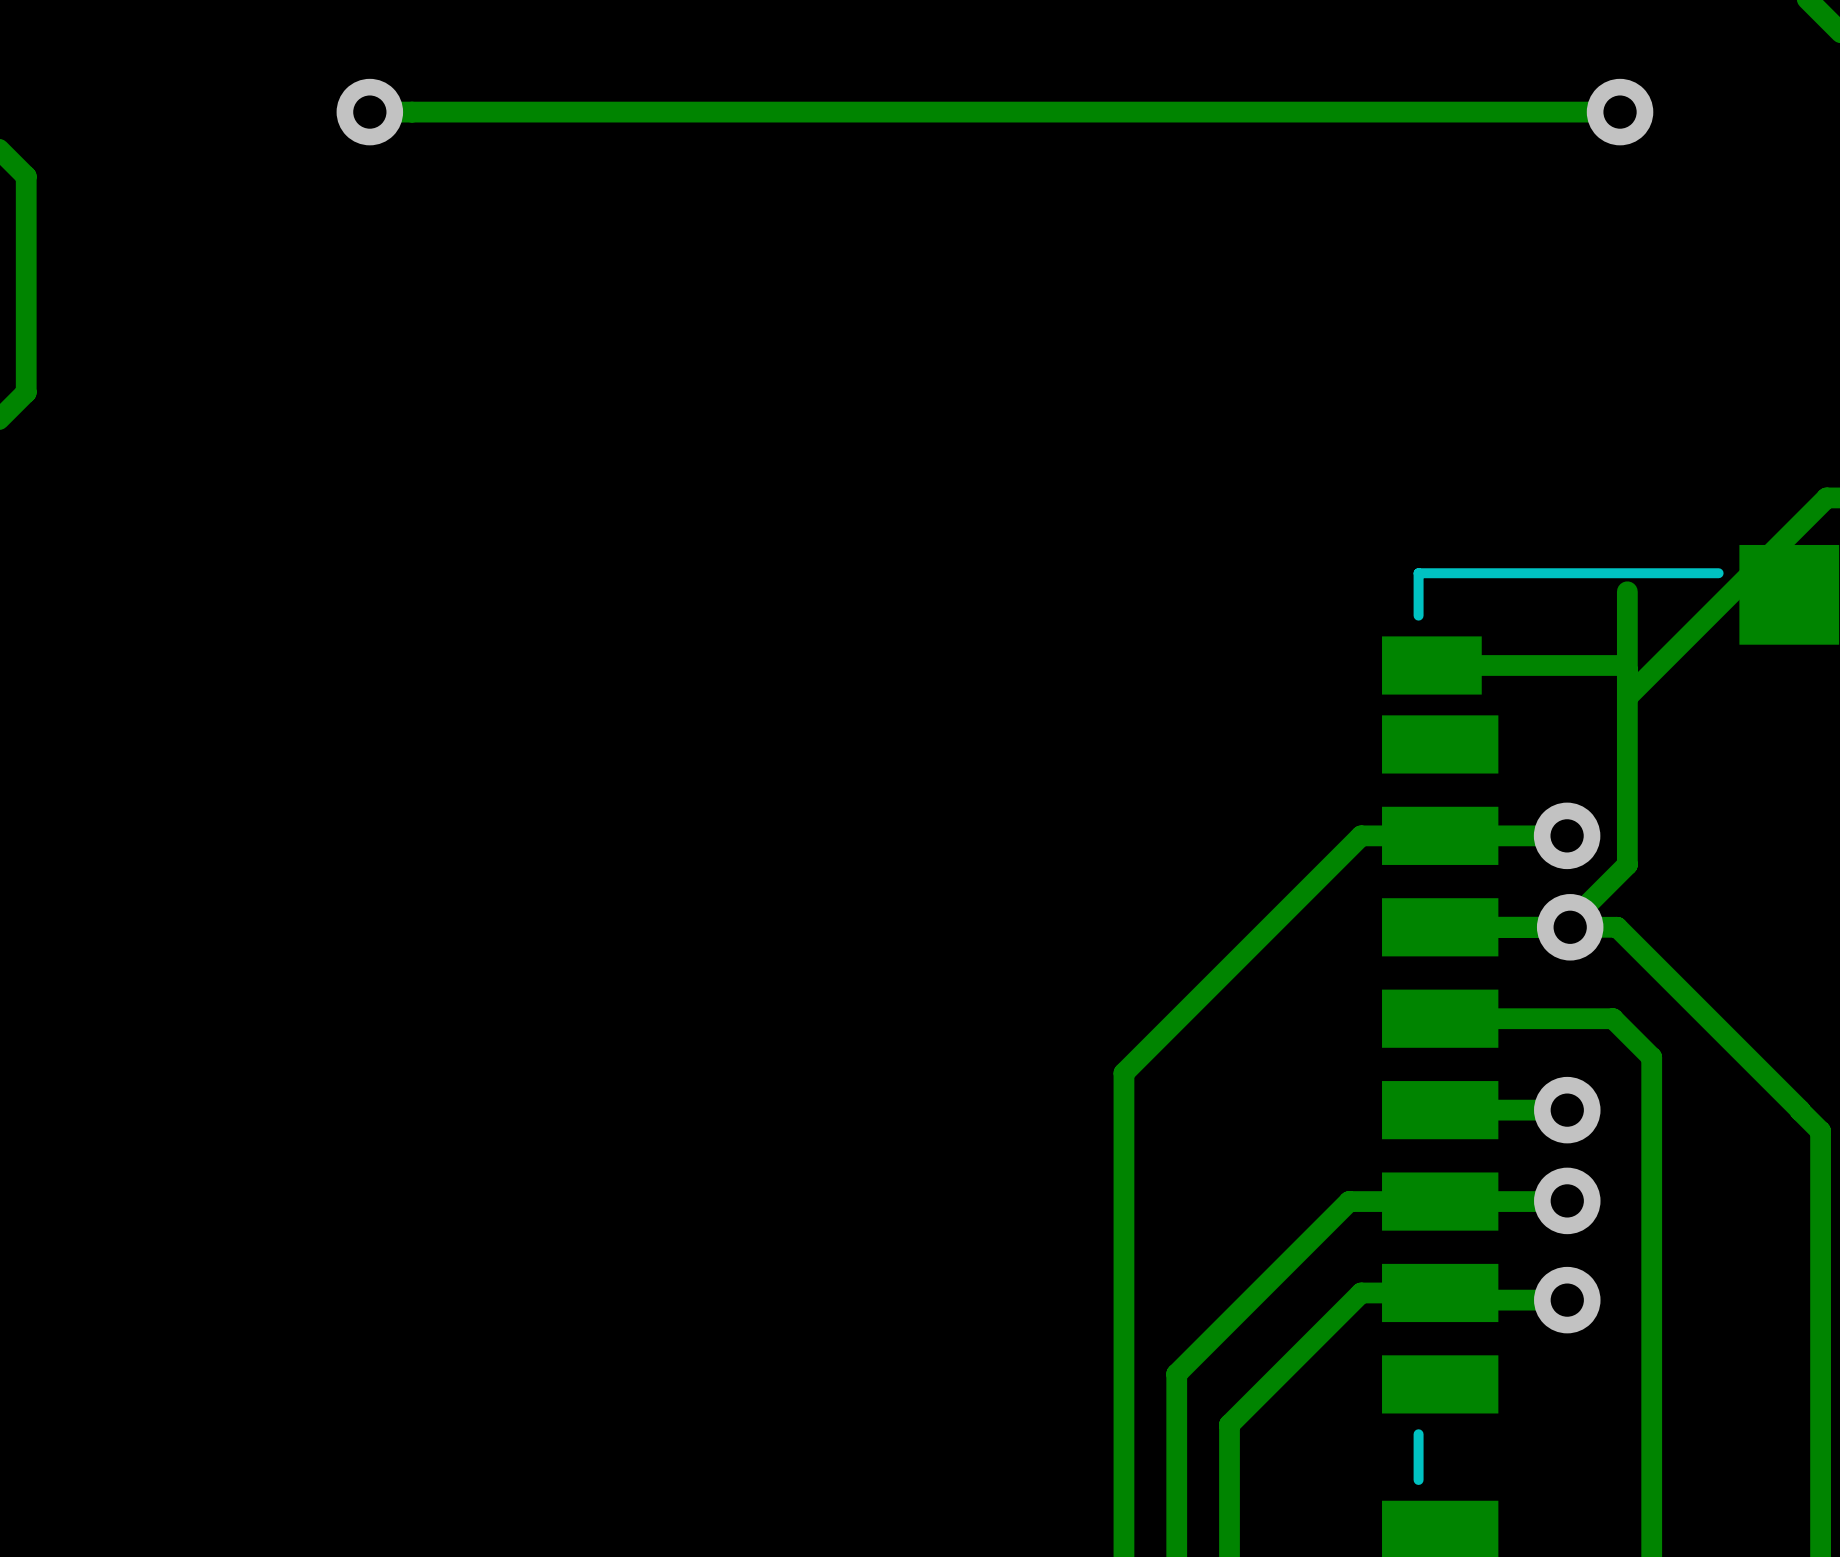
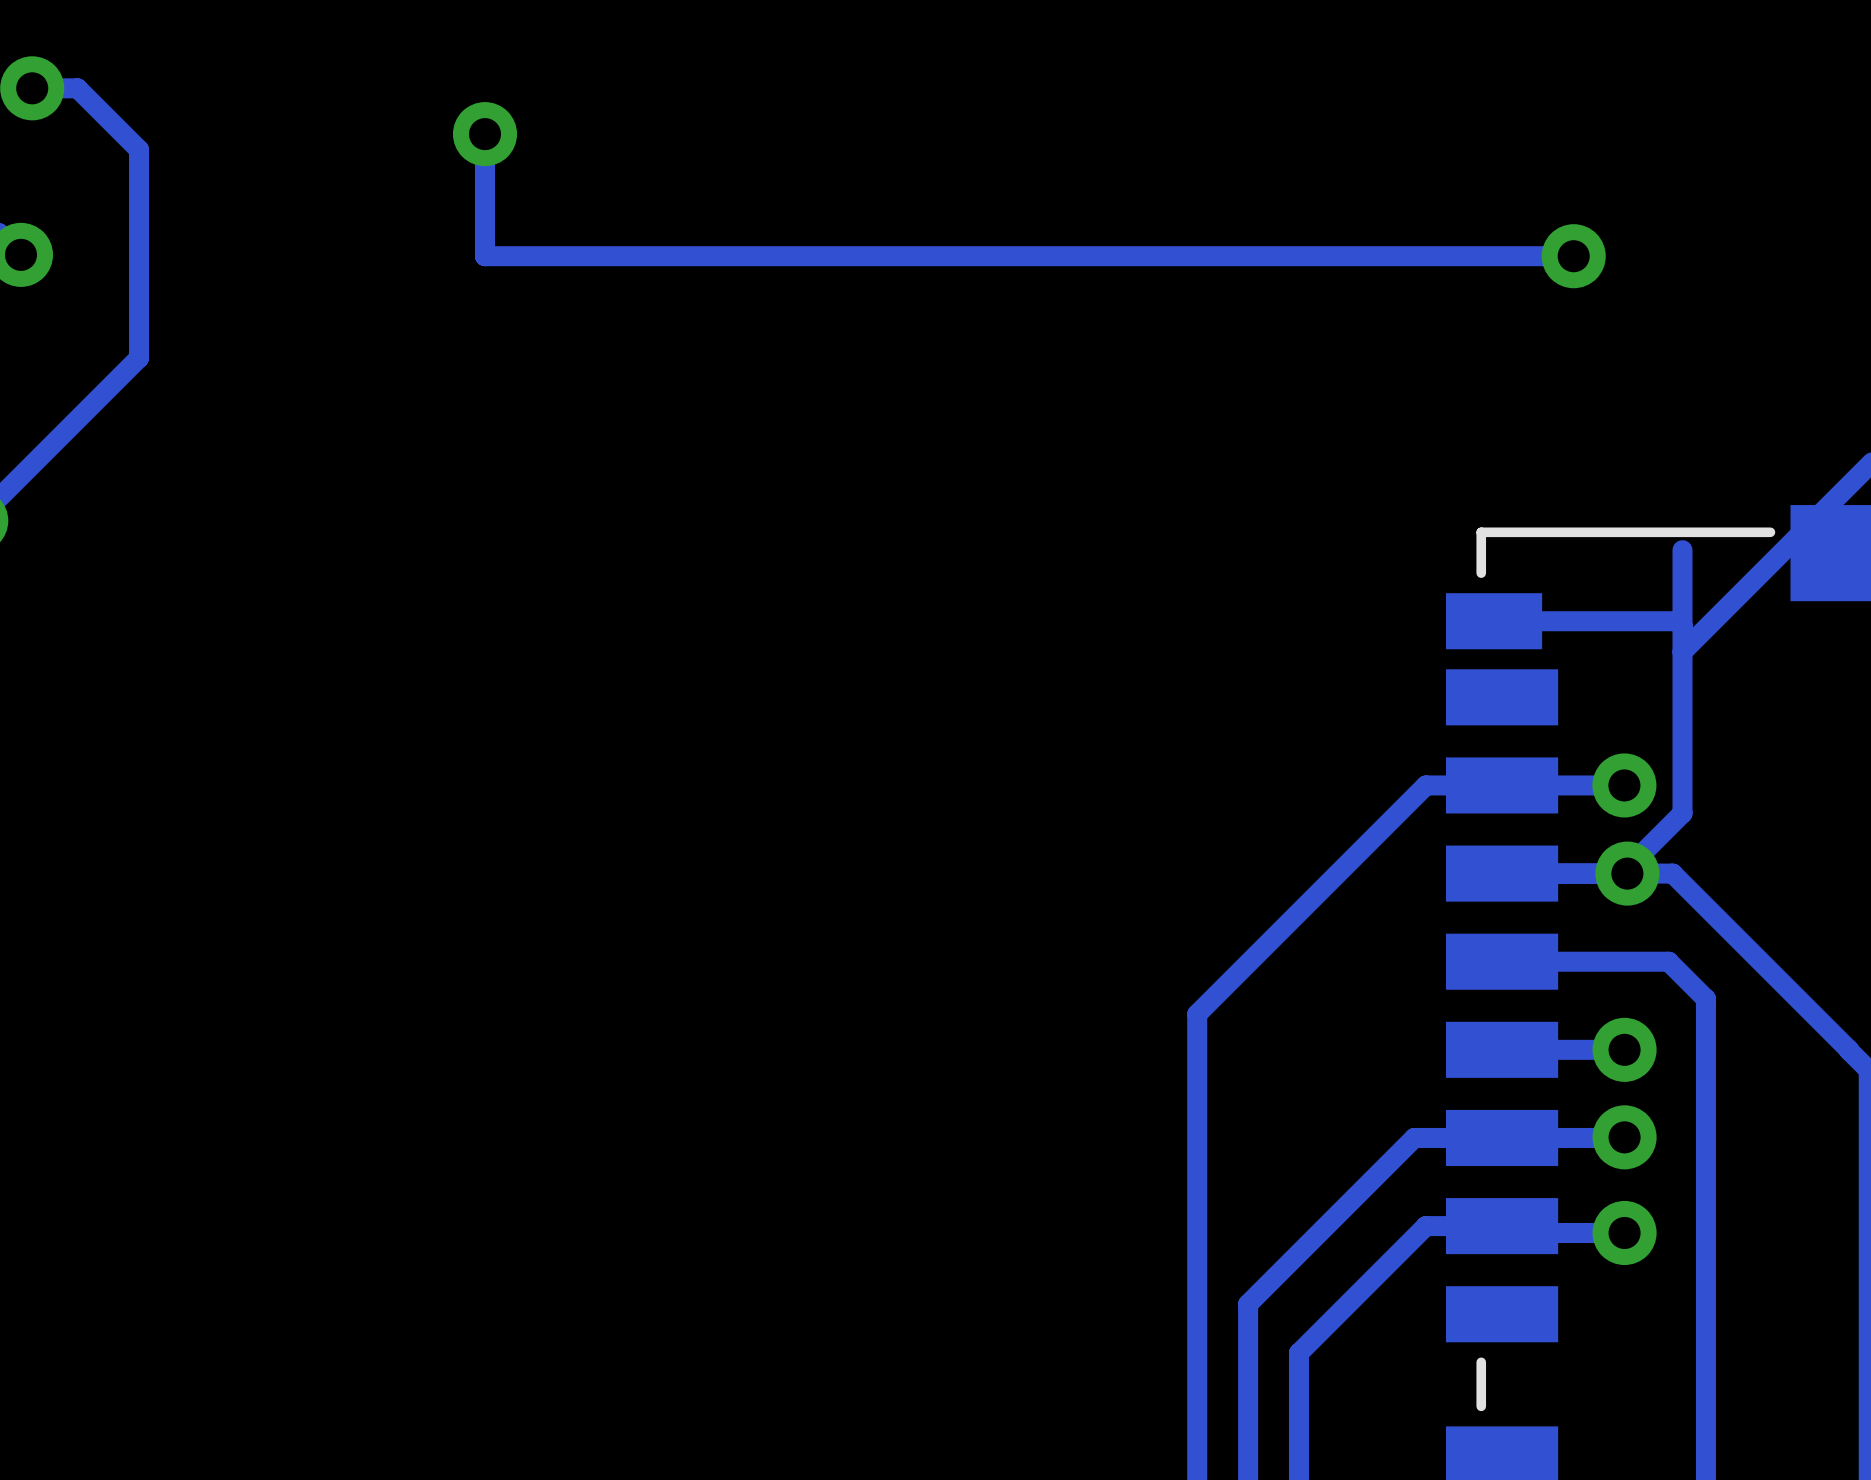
via position: (369, 112) -> (484, 134)
track: (1620, 112) (369, 112) -> none
via position: (1620, 112) -> (1573, 256)
track: none -> (484, 134) (484, 256) (1573, 256)

